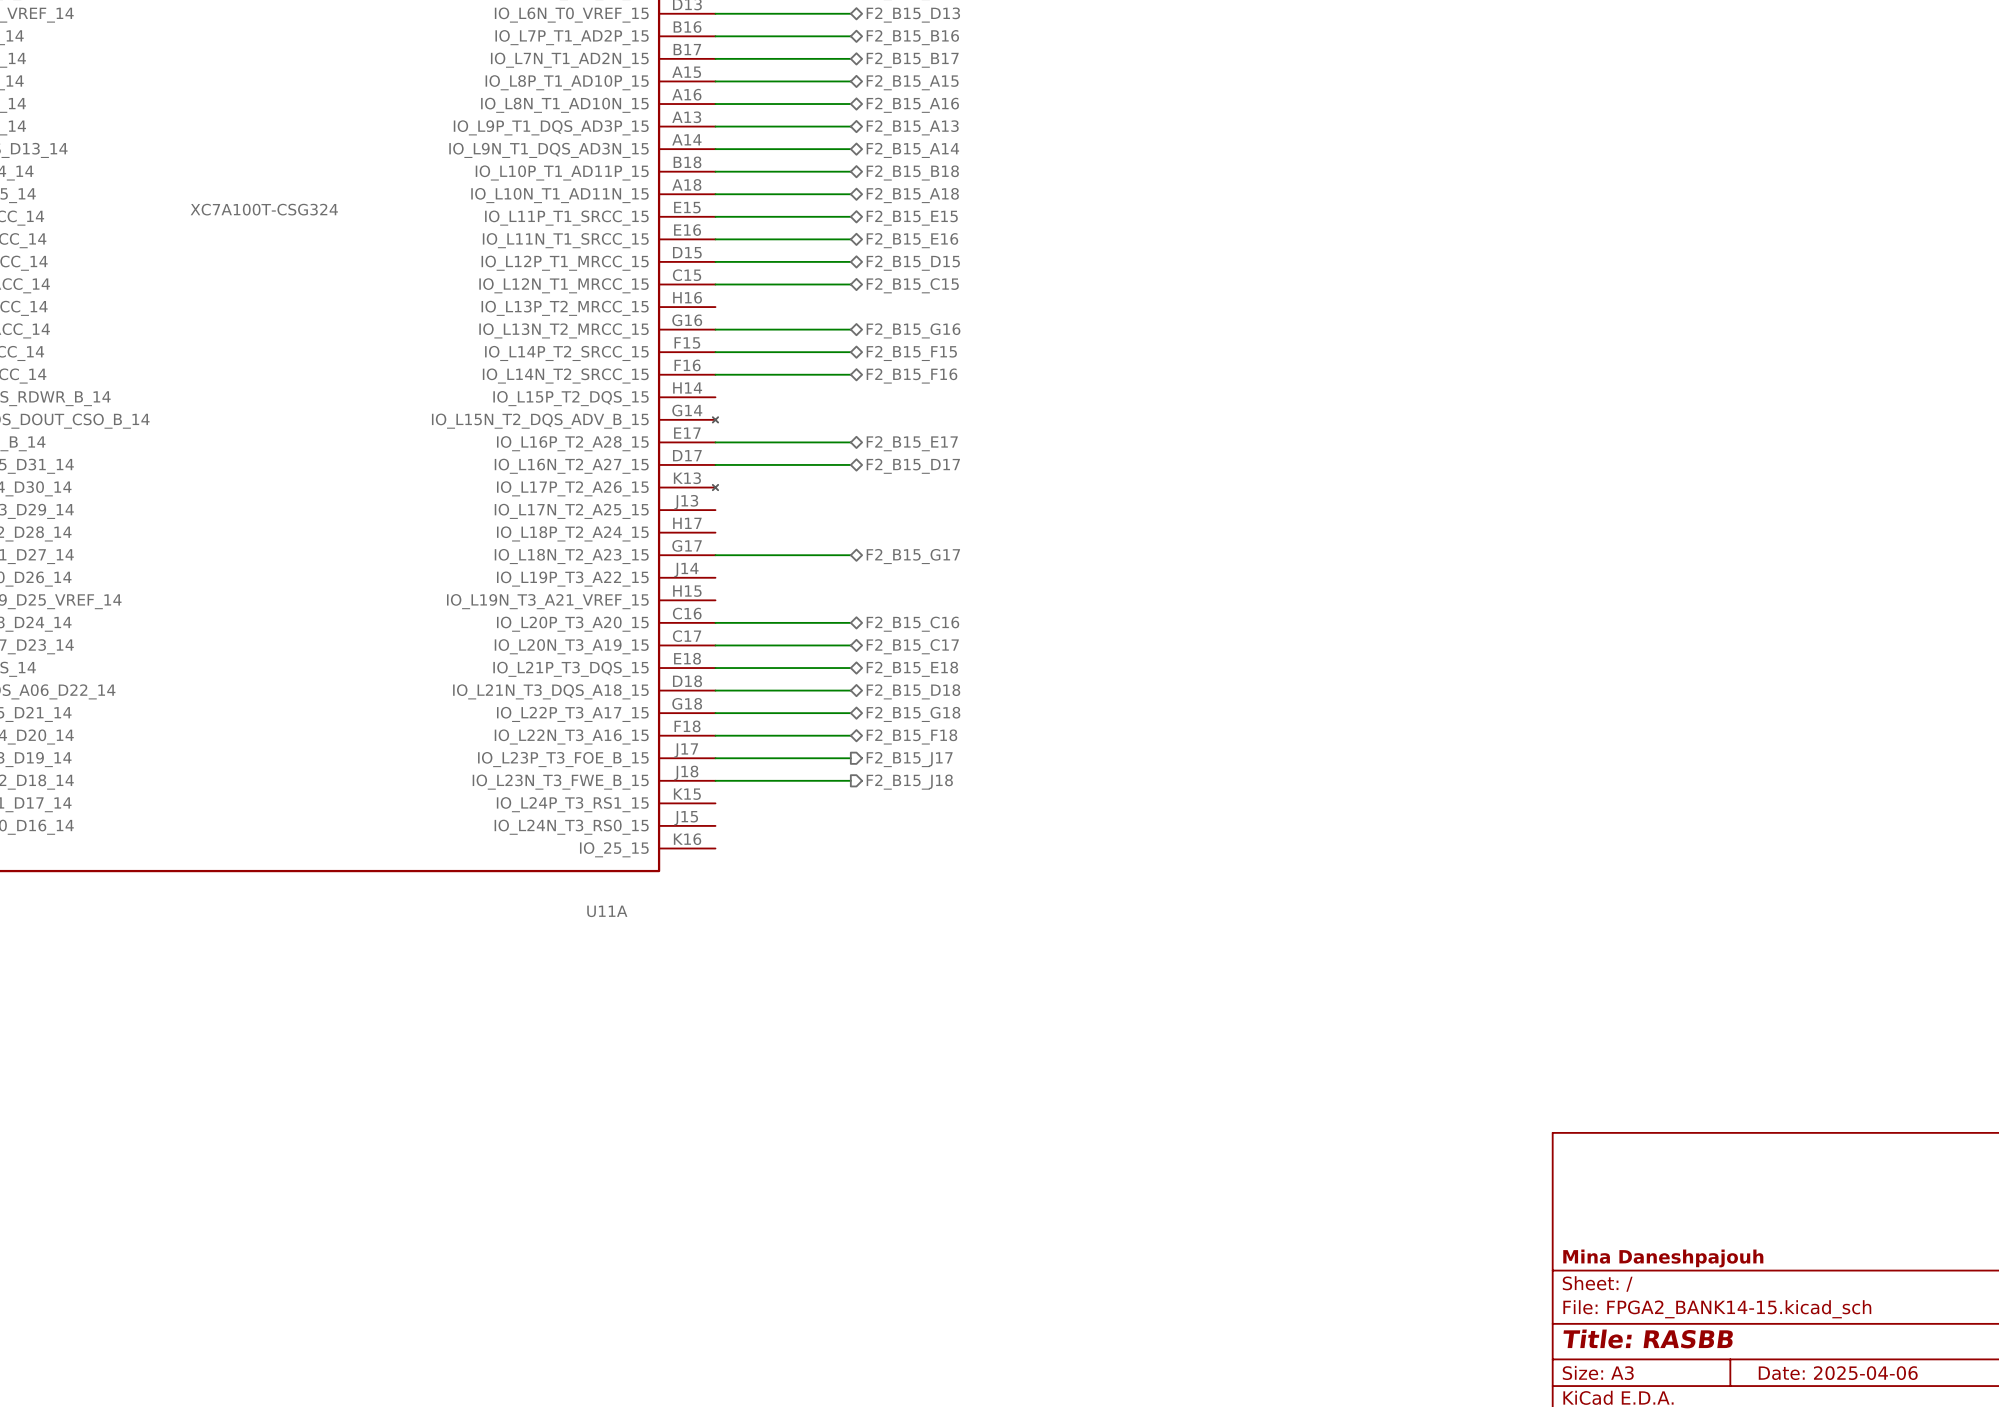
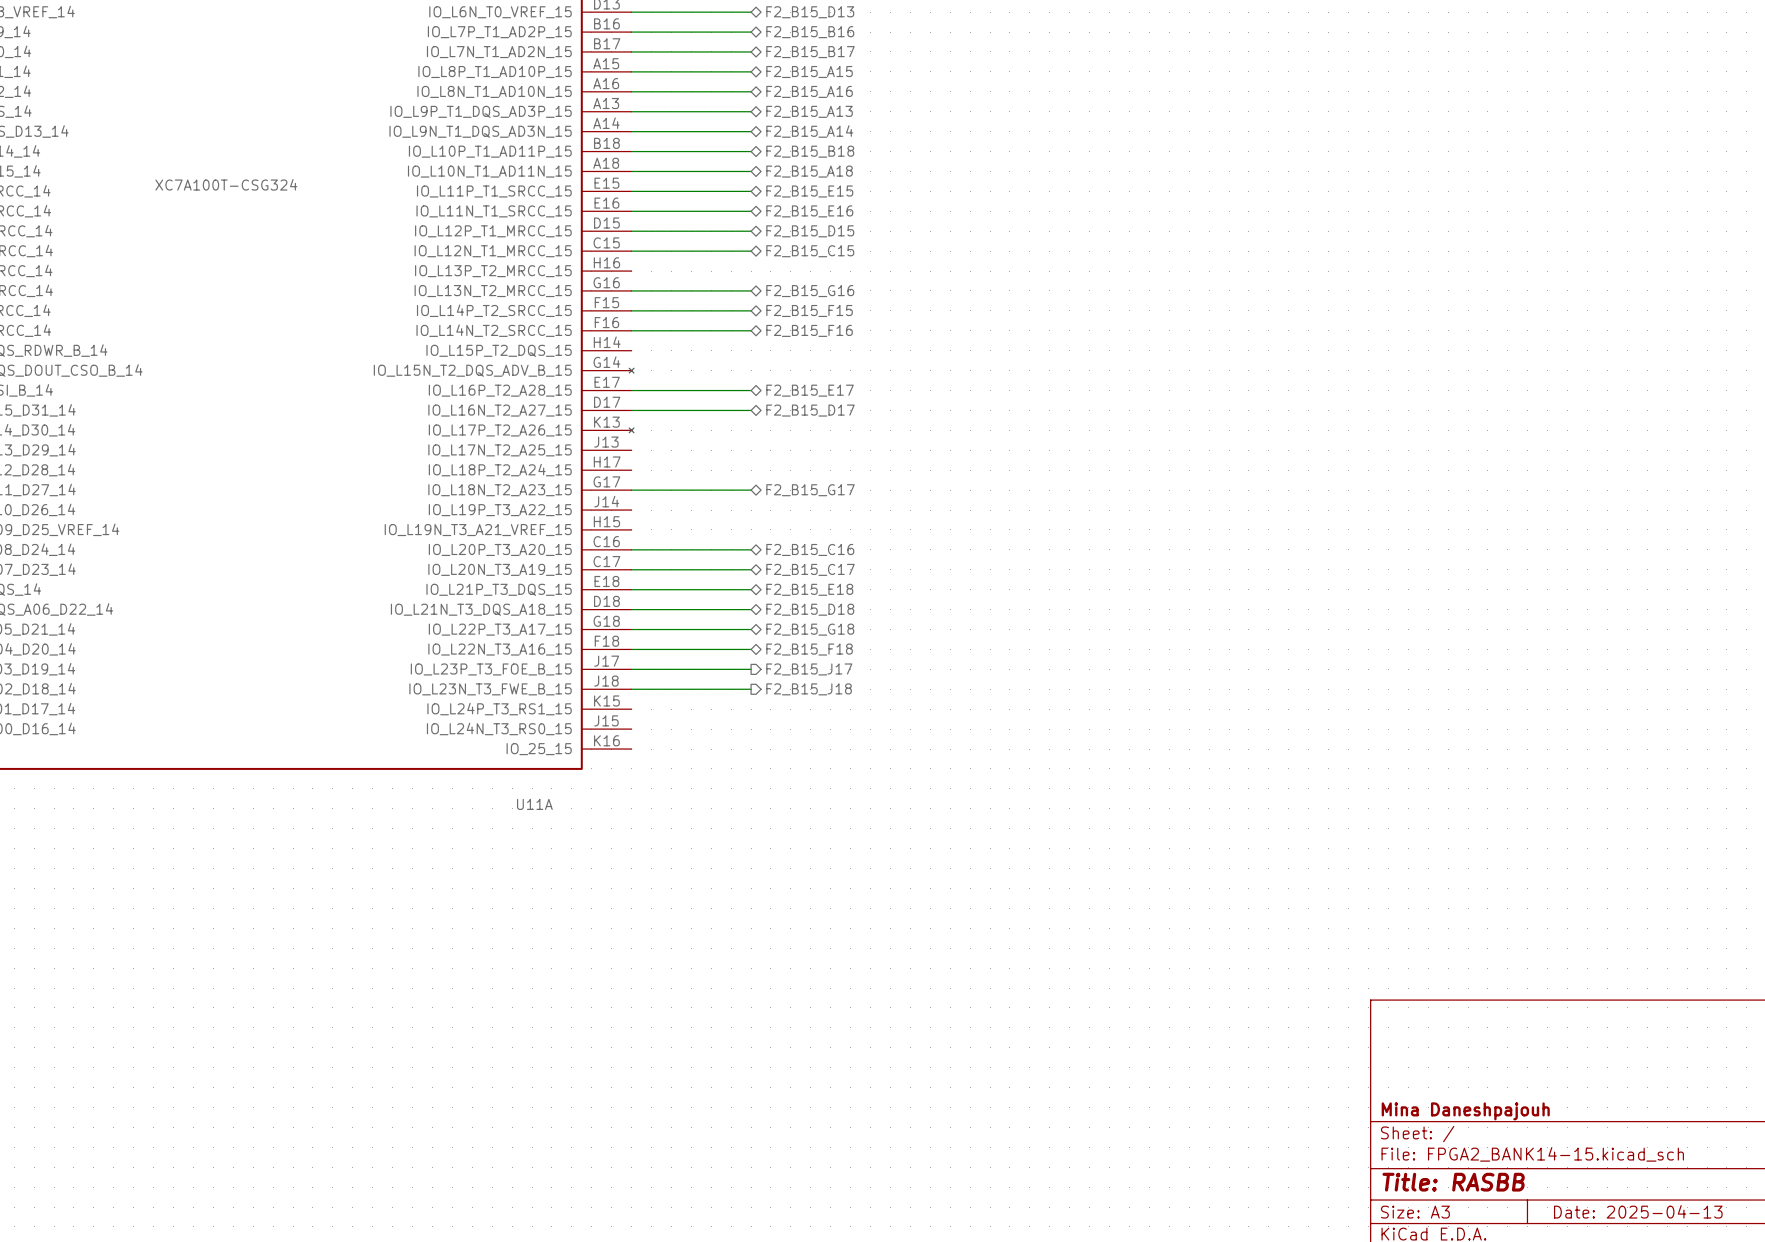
title block: Date: 2025-04-06 (1838, 1373) -> Date: 2025-04-13 (1638, 1211)

